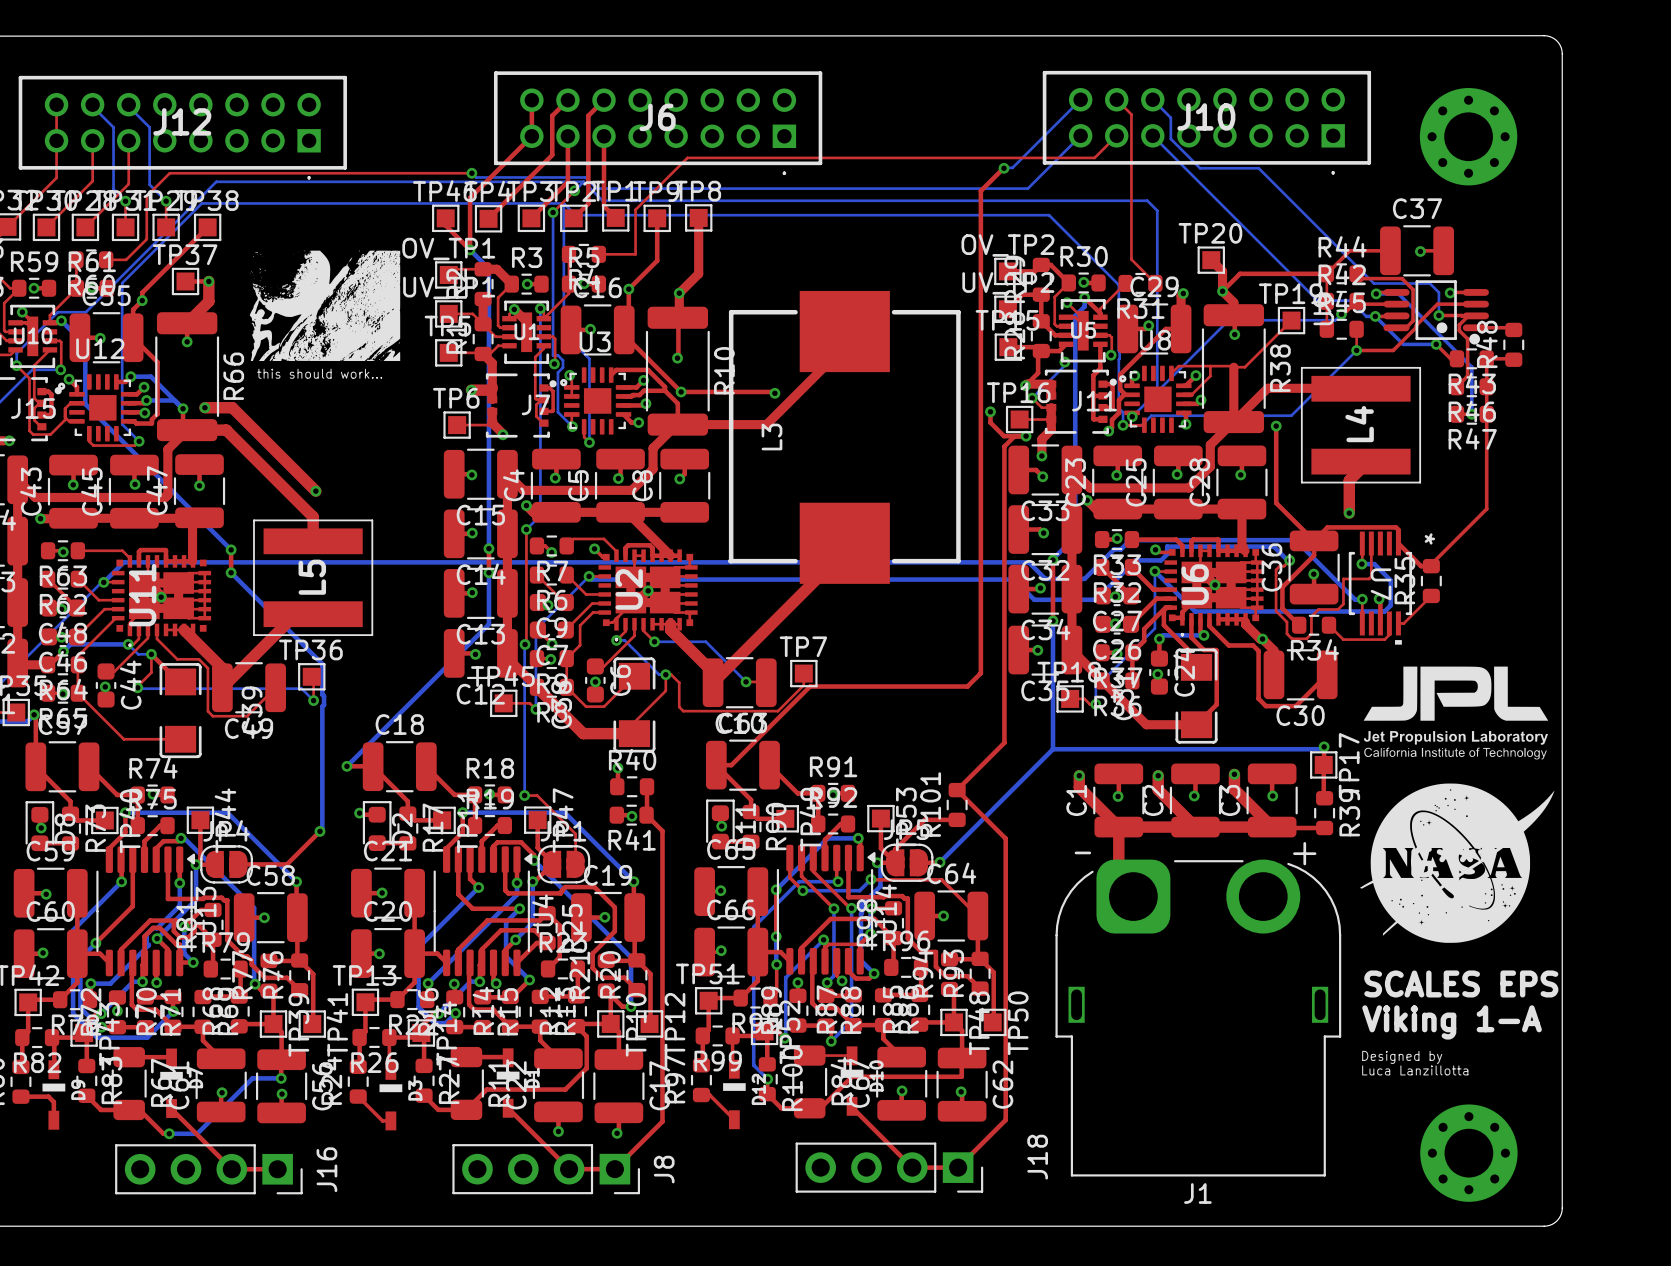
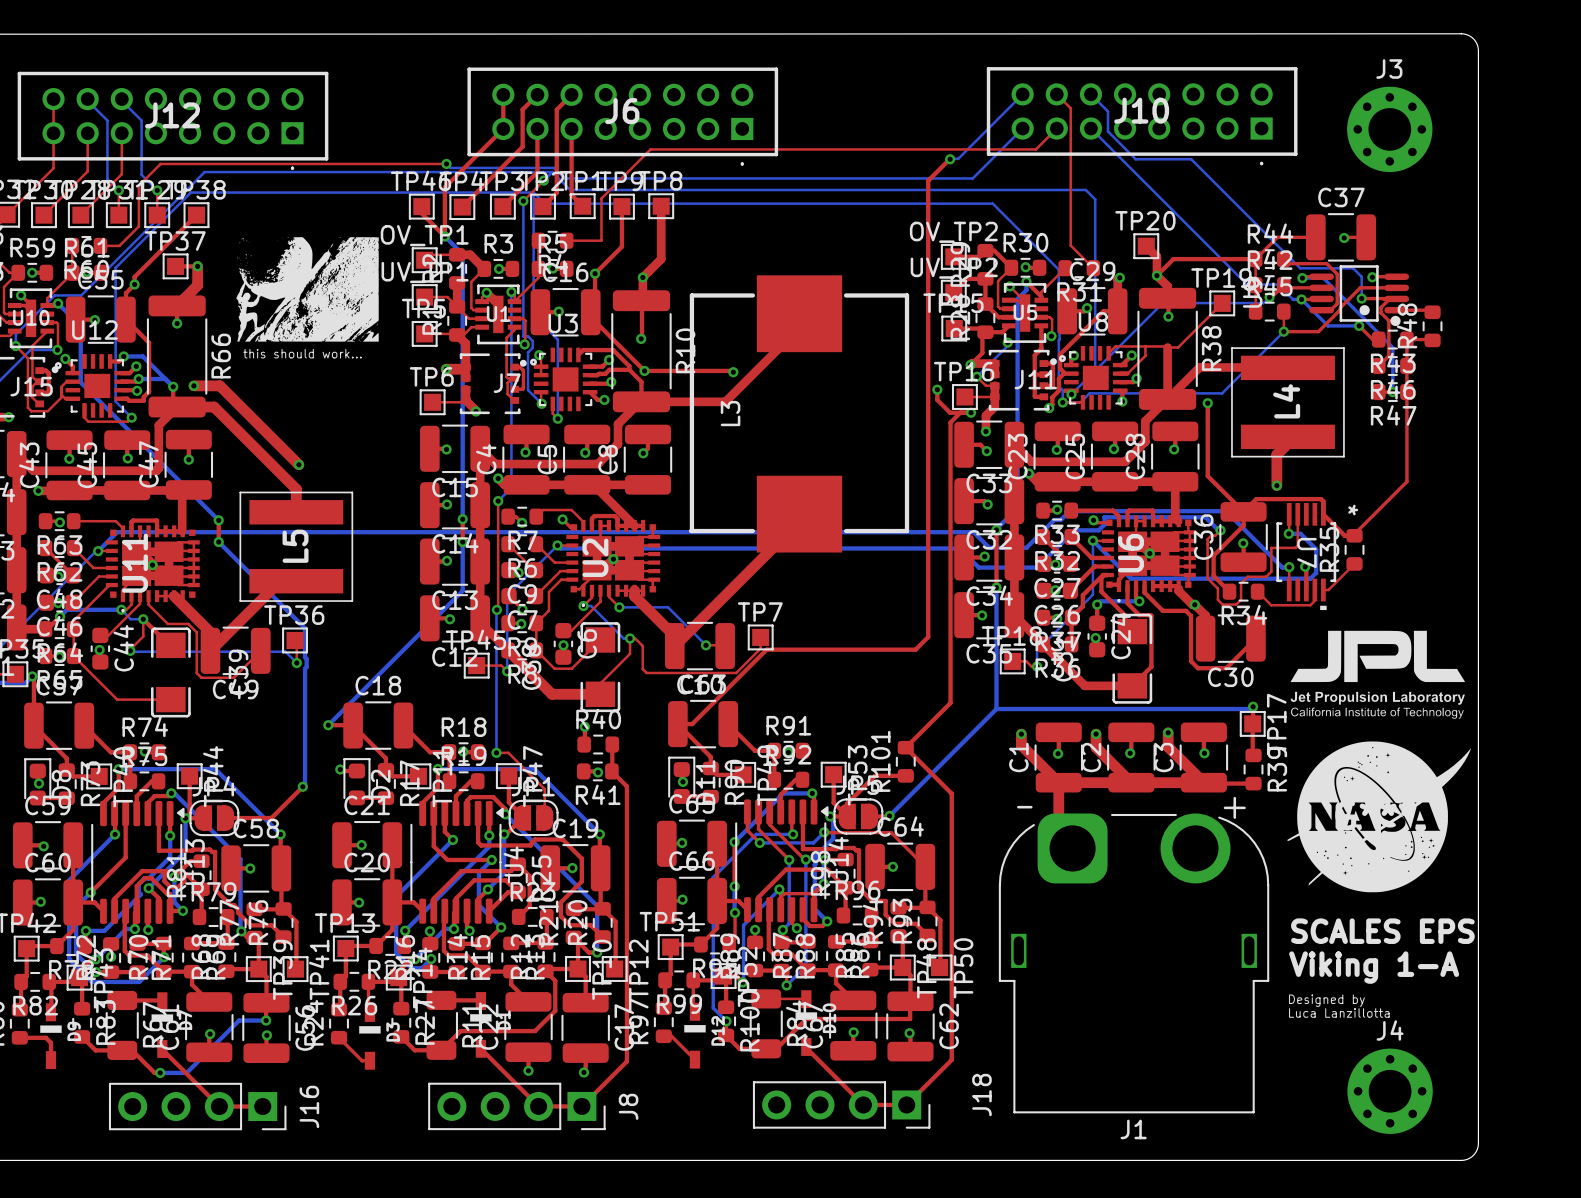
part: (1468, 136) -> none
J3: none -> (1389, 129)
part: (1468, 1153) -> none
J4: none -> (1390, 1091)

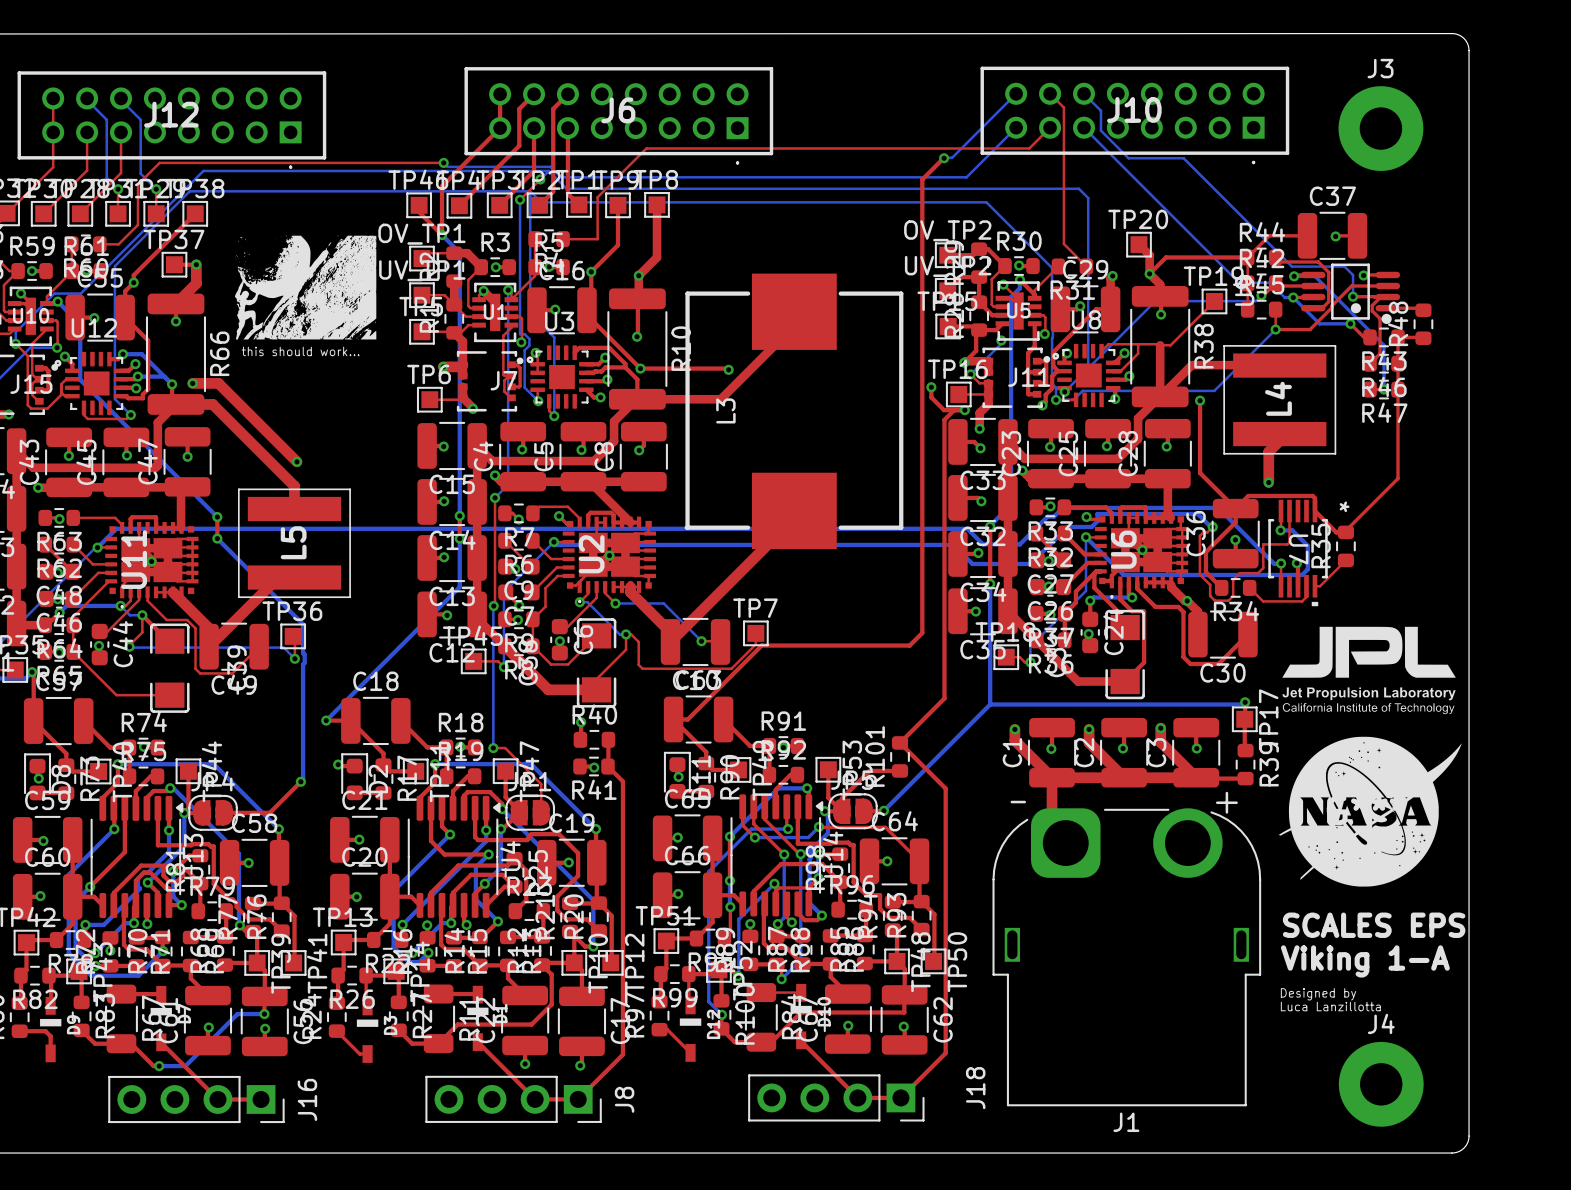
J3 footprint: [1347, 86, 1433, 173] -> [1338, 86, 1424, 171]
J4 footprint: [1347, 1048, 1433, 1134] -> [1338, 1041, 1424, 1127]

